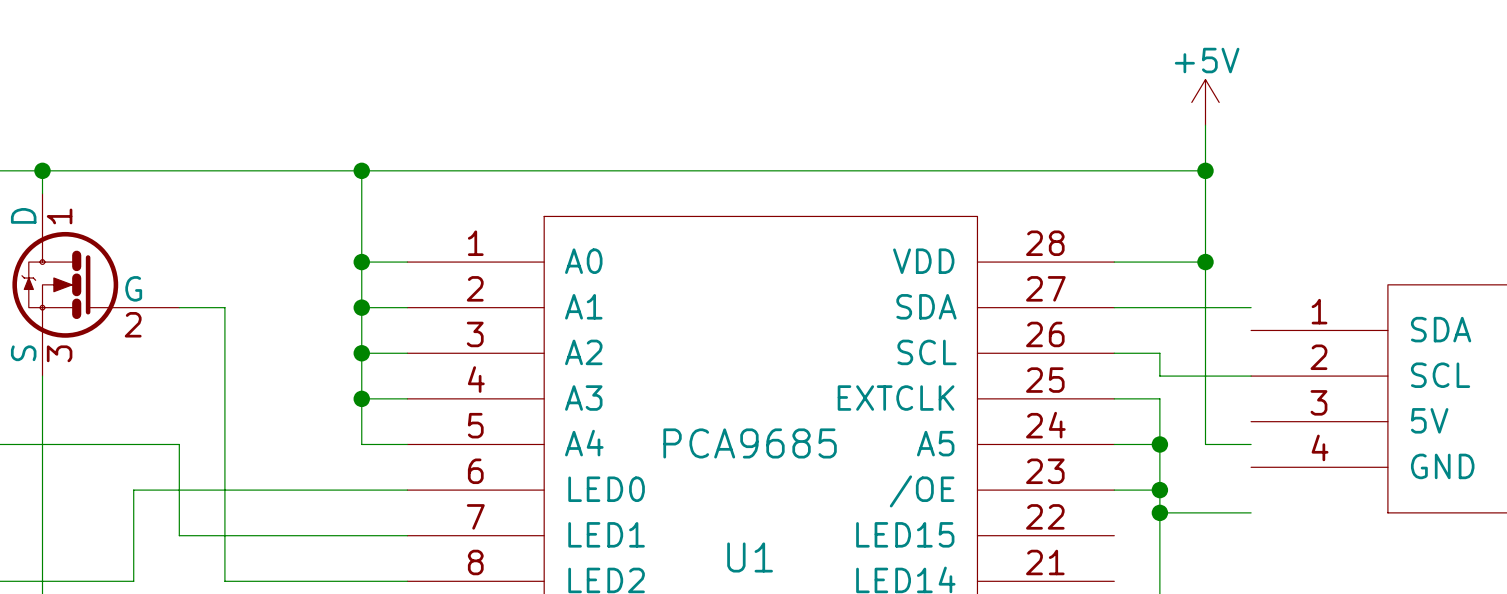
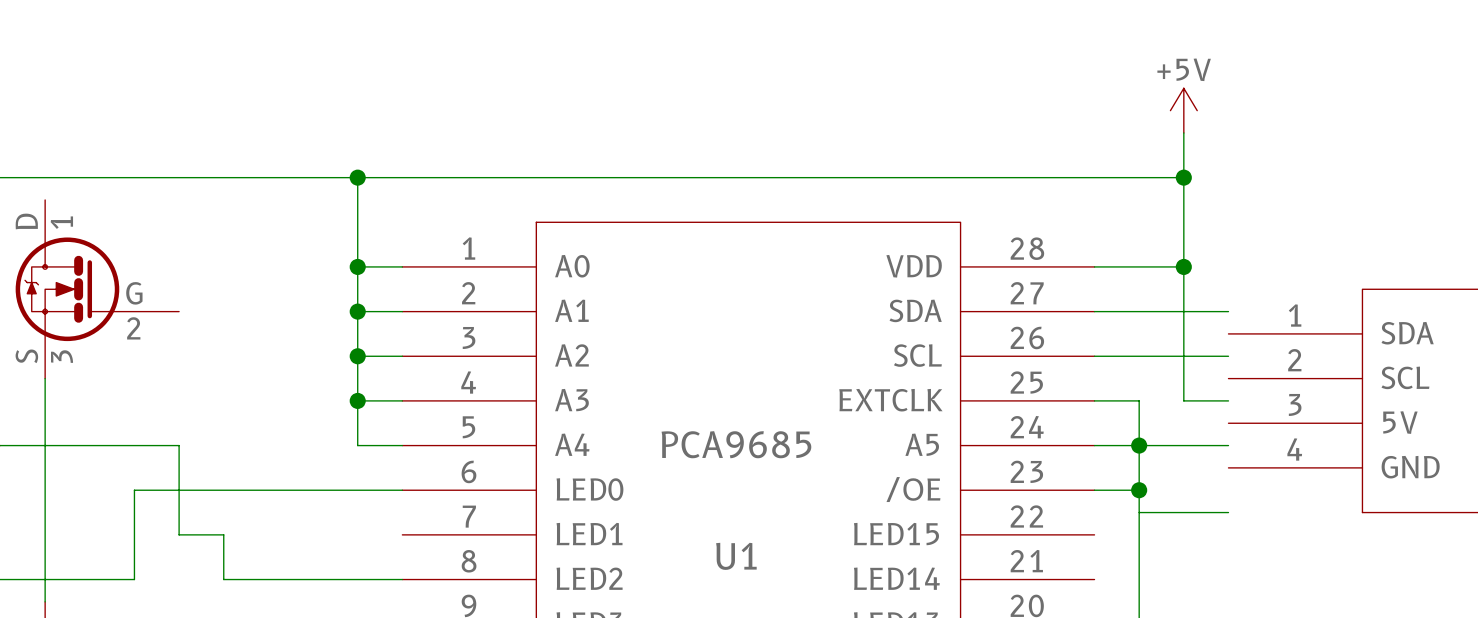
wire: (42, 170) (42, 193) -> none
junction: (42, 170) -> none
wire: (179, 307) (224, 307) (224, 535) (407, 535) -> none
wire: (1159, 353) (1159, 376) (1251, 376) -> (1139, 356) (1228, 356)
wire: (1205, 398) (1205, 444) -> (1183, 400) (1228, 400)
wire: none -> (1139, 445) (1183, 445)
junction: (1159, 512) -> none

